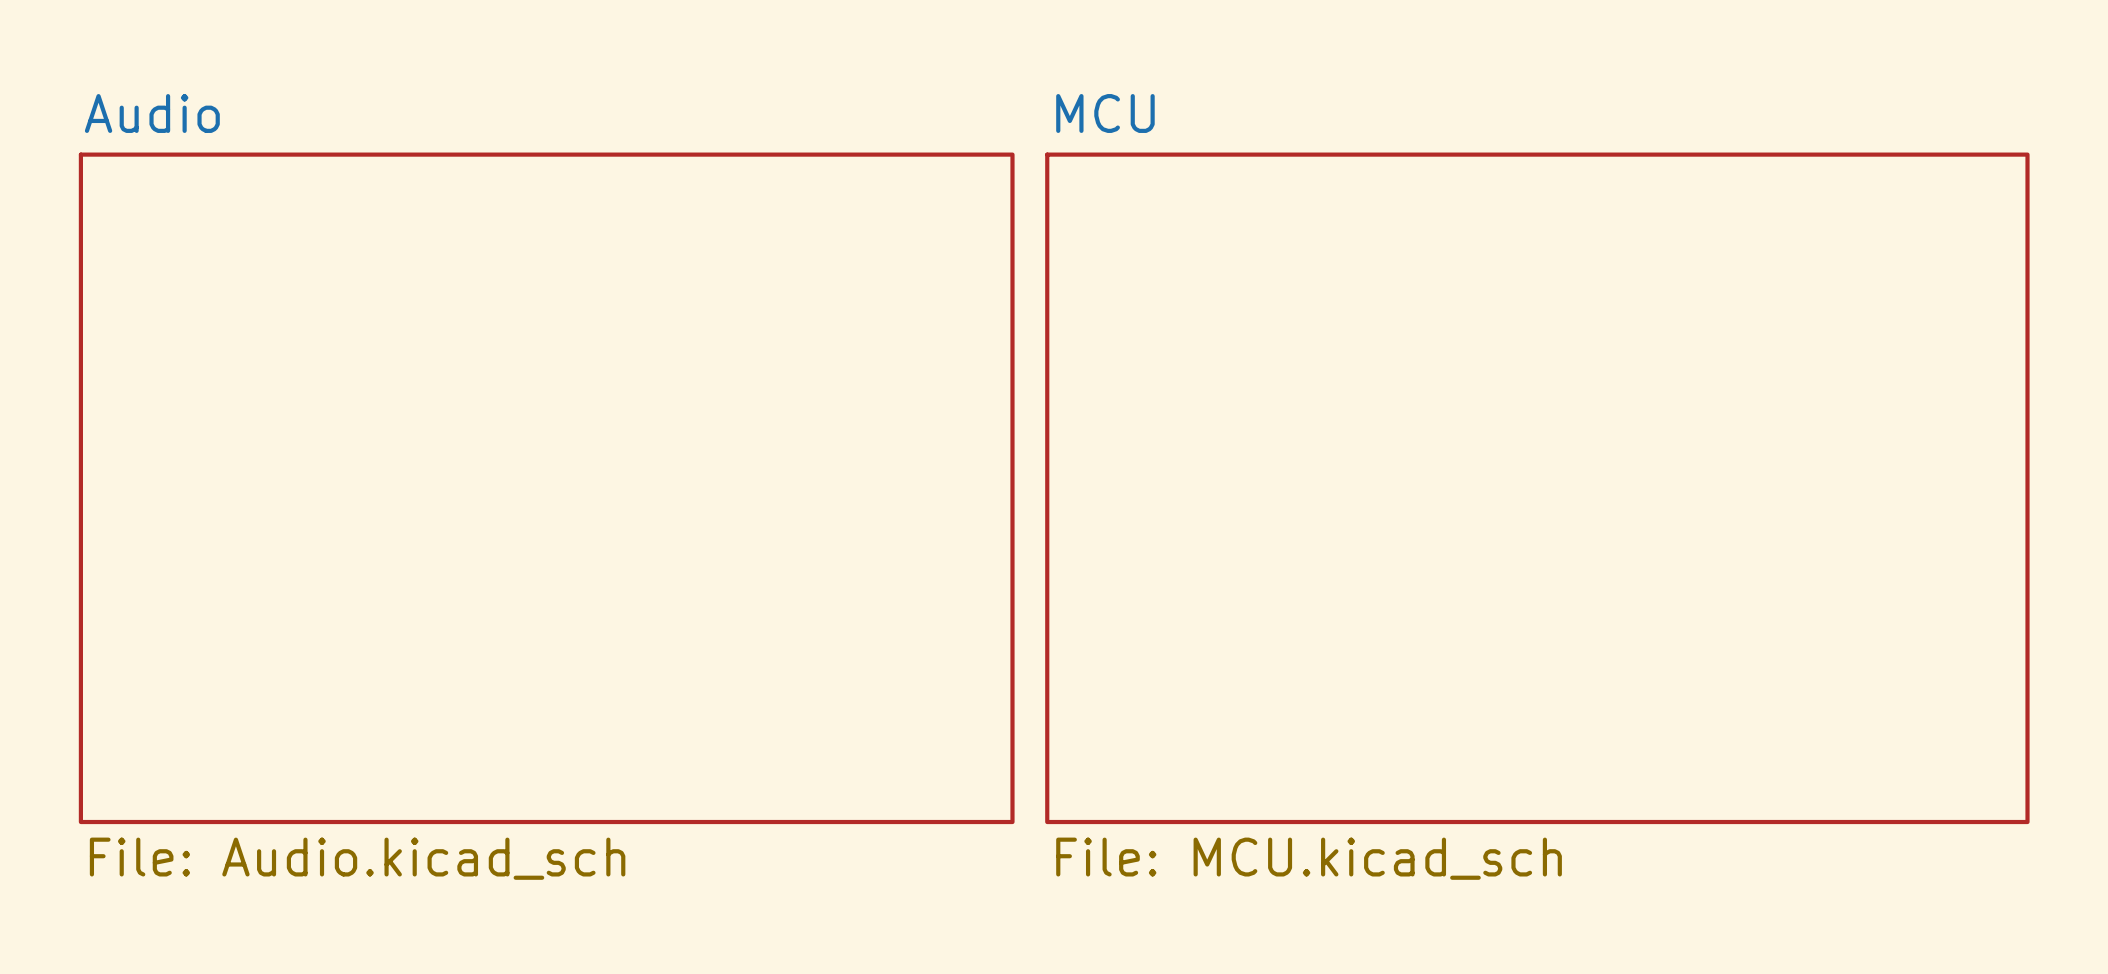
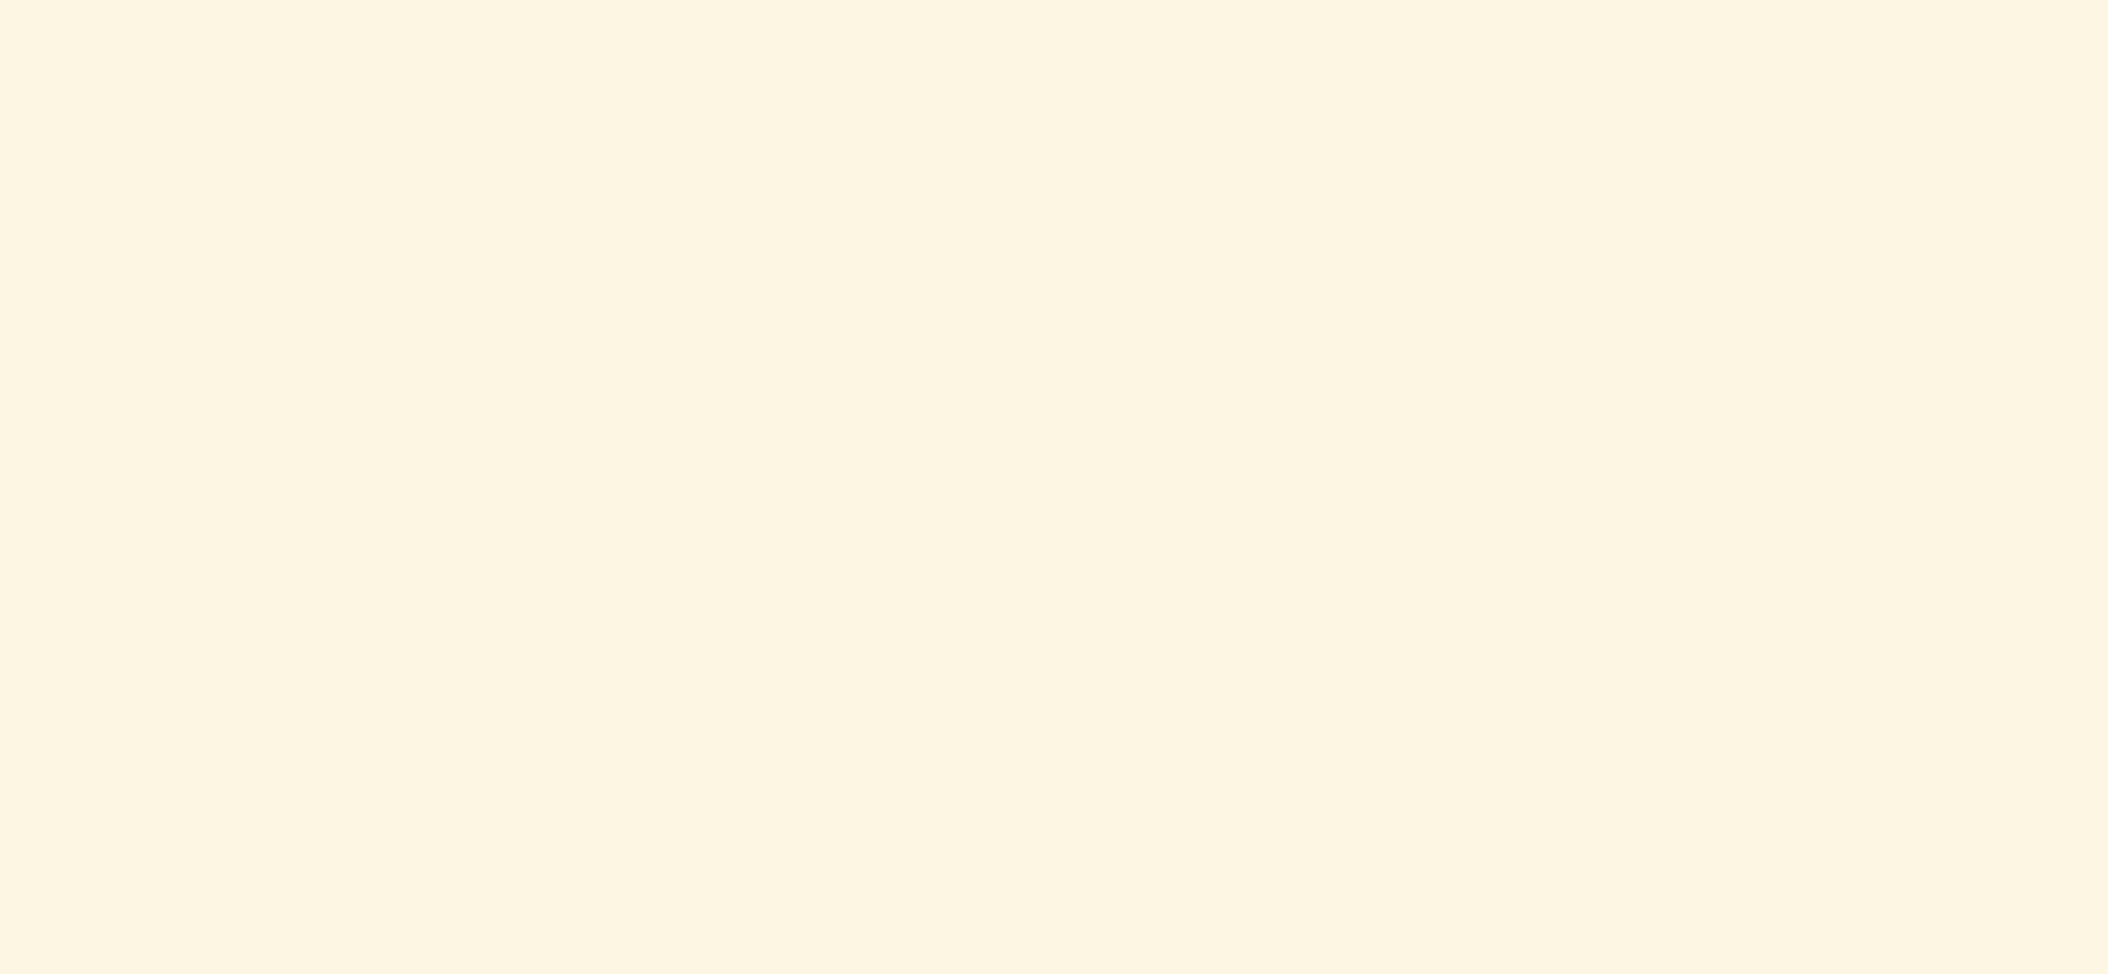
sheet Audio: File: Audio.kicad_sch (546, 488) -> none
sheet MCU: File: MCU.kicad_sch (1537, 488) -> none

